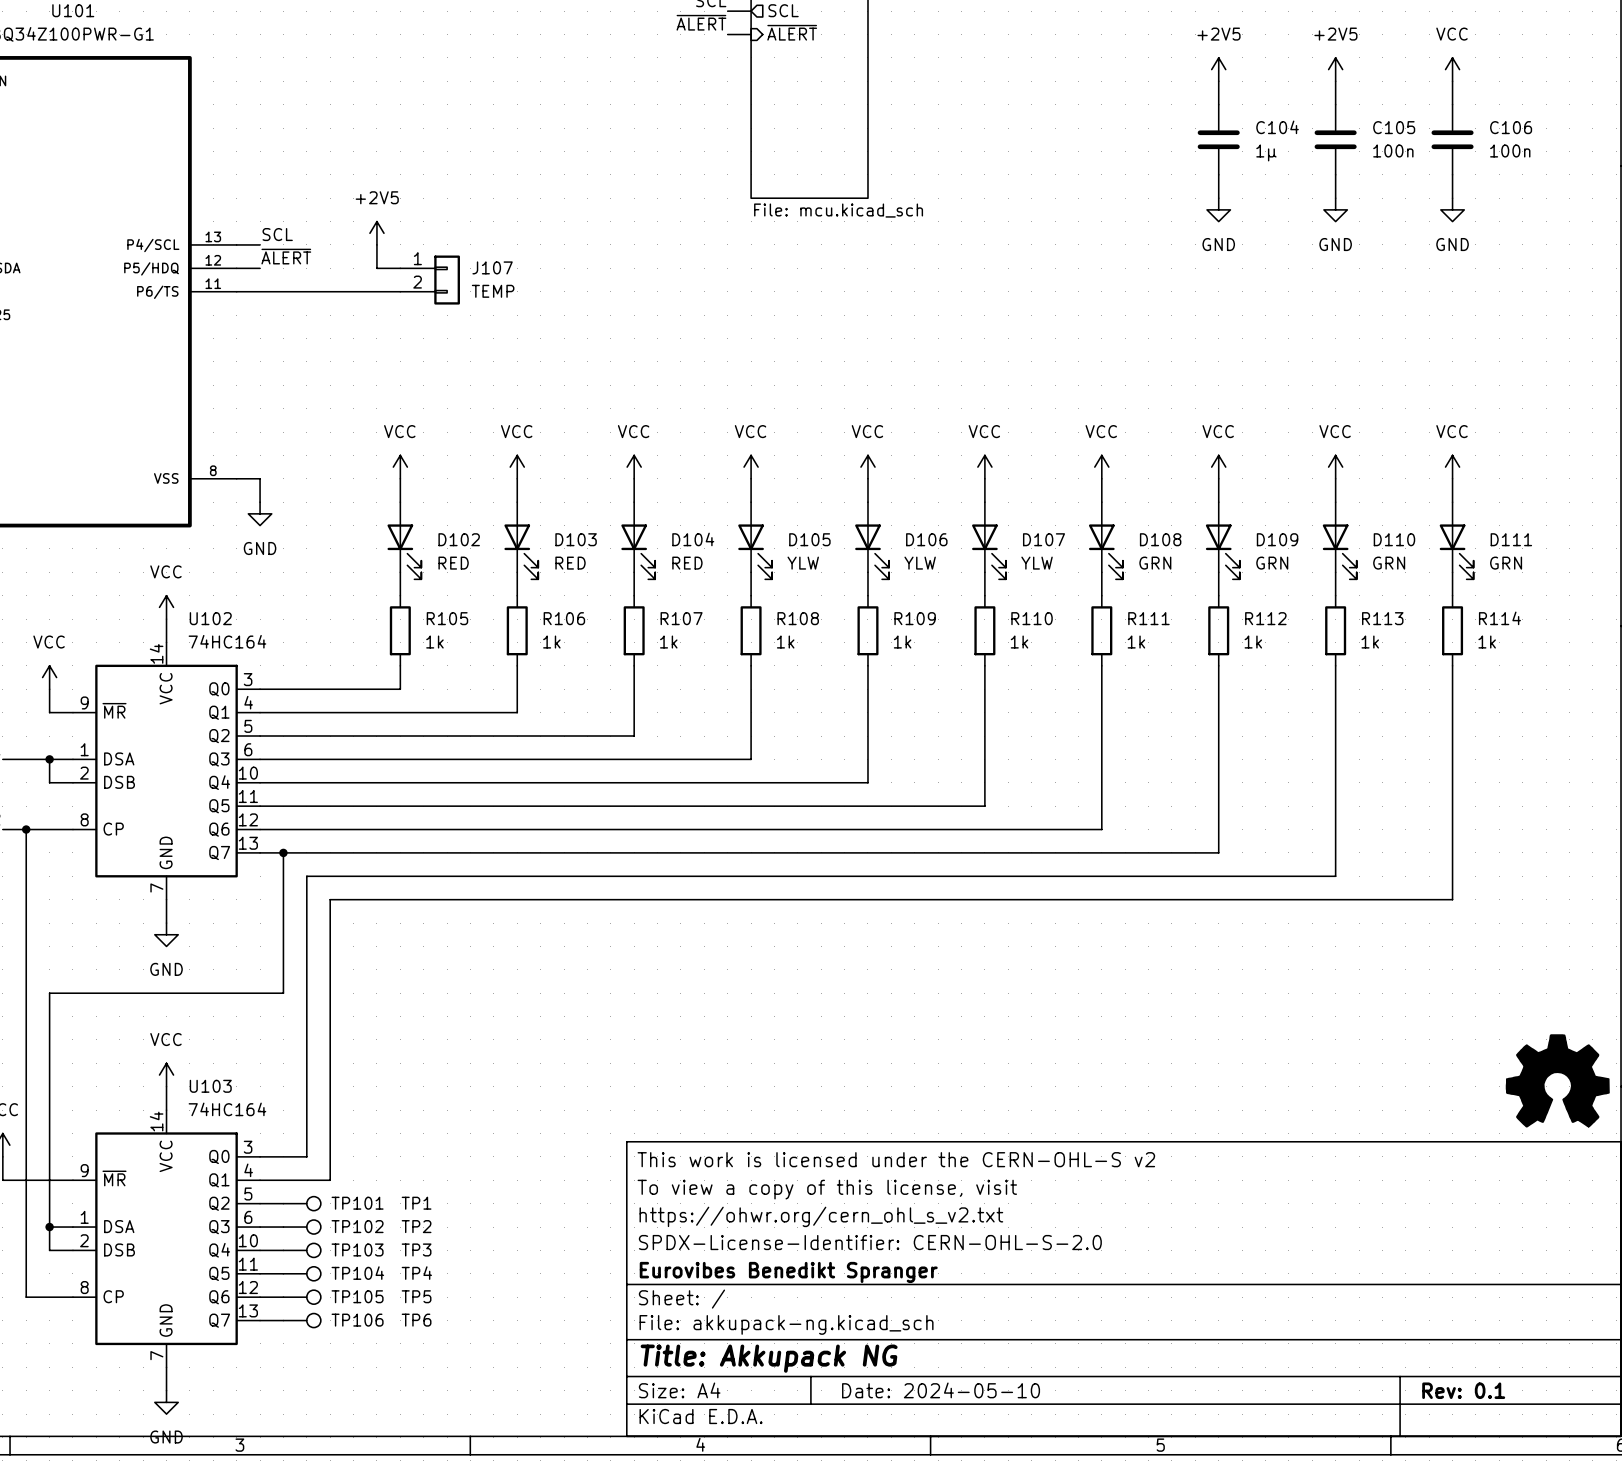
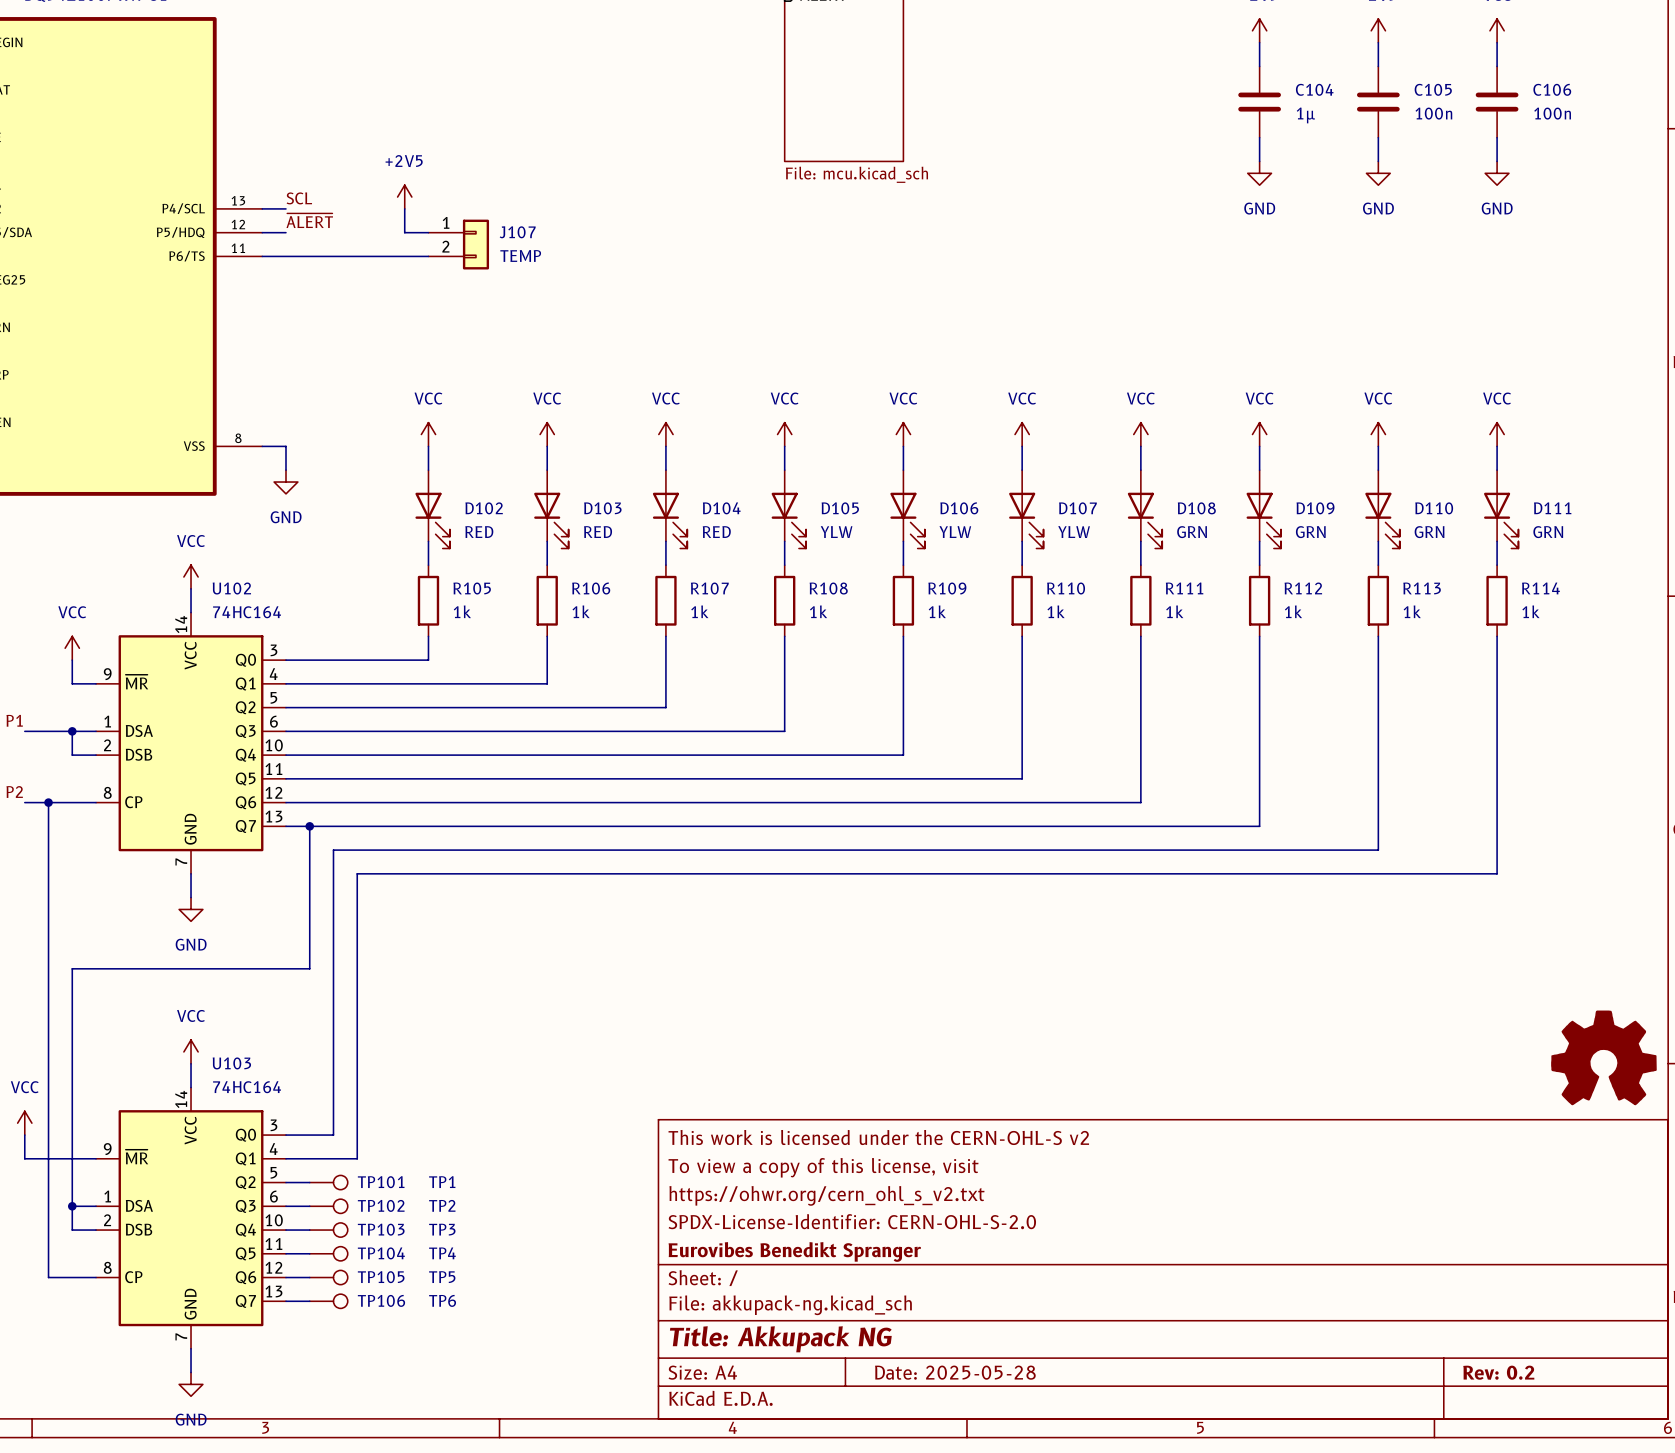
title block: Date: 2024-05-10 (941, 1390) -> Date: 2025-05-28 (955, 1372)
title block: Rev: 0.1 (1463, 1390) -> Rev: 0.2 (1498, 1372)

